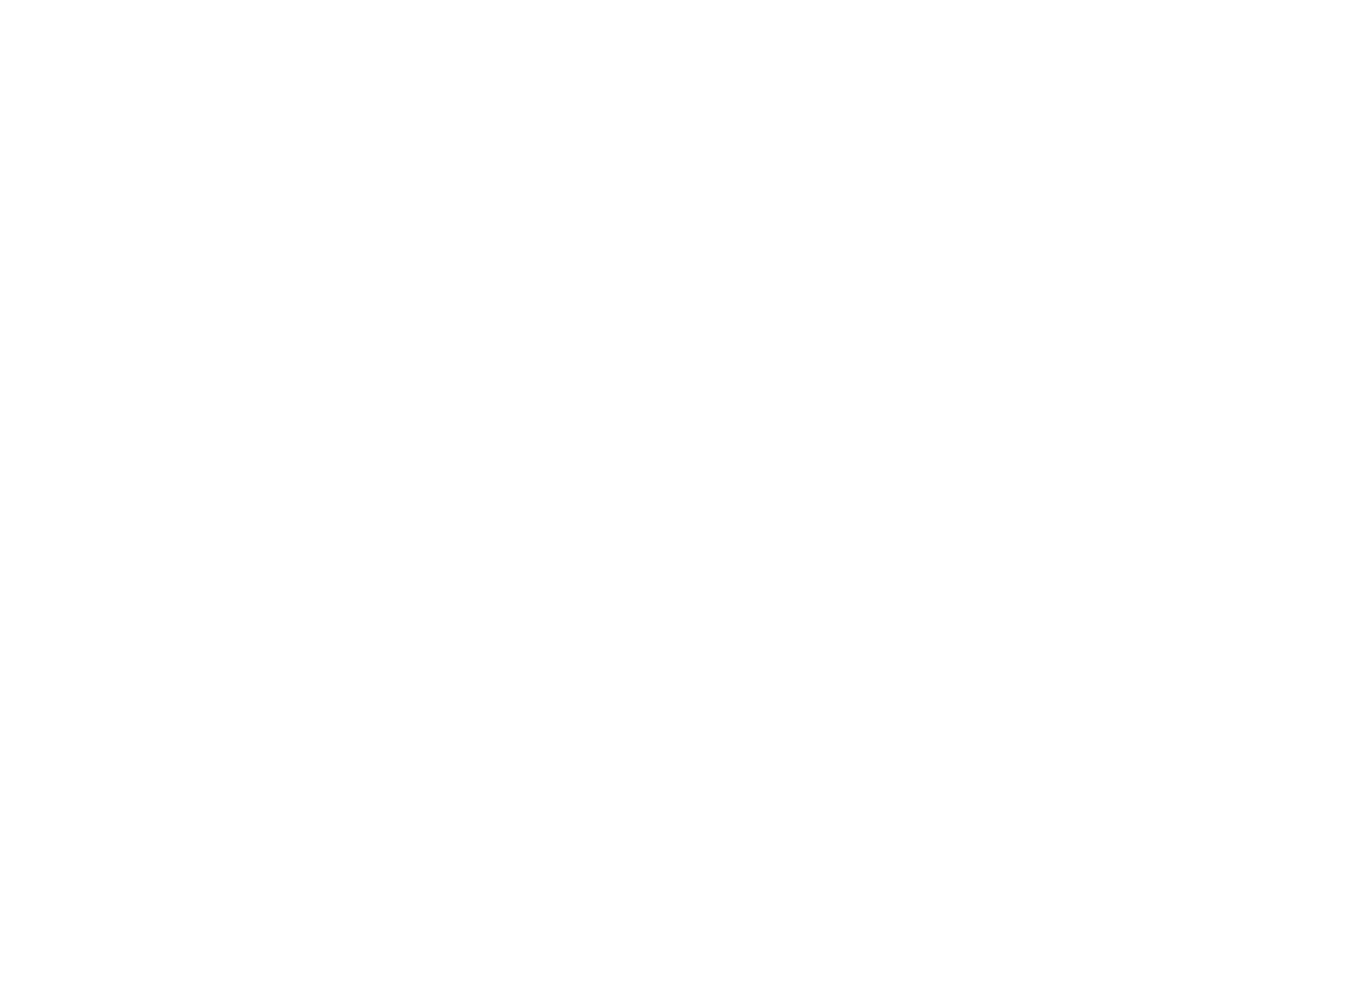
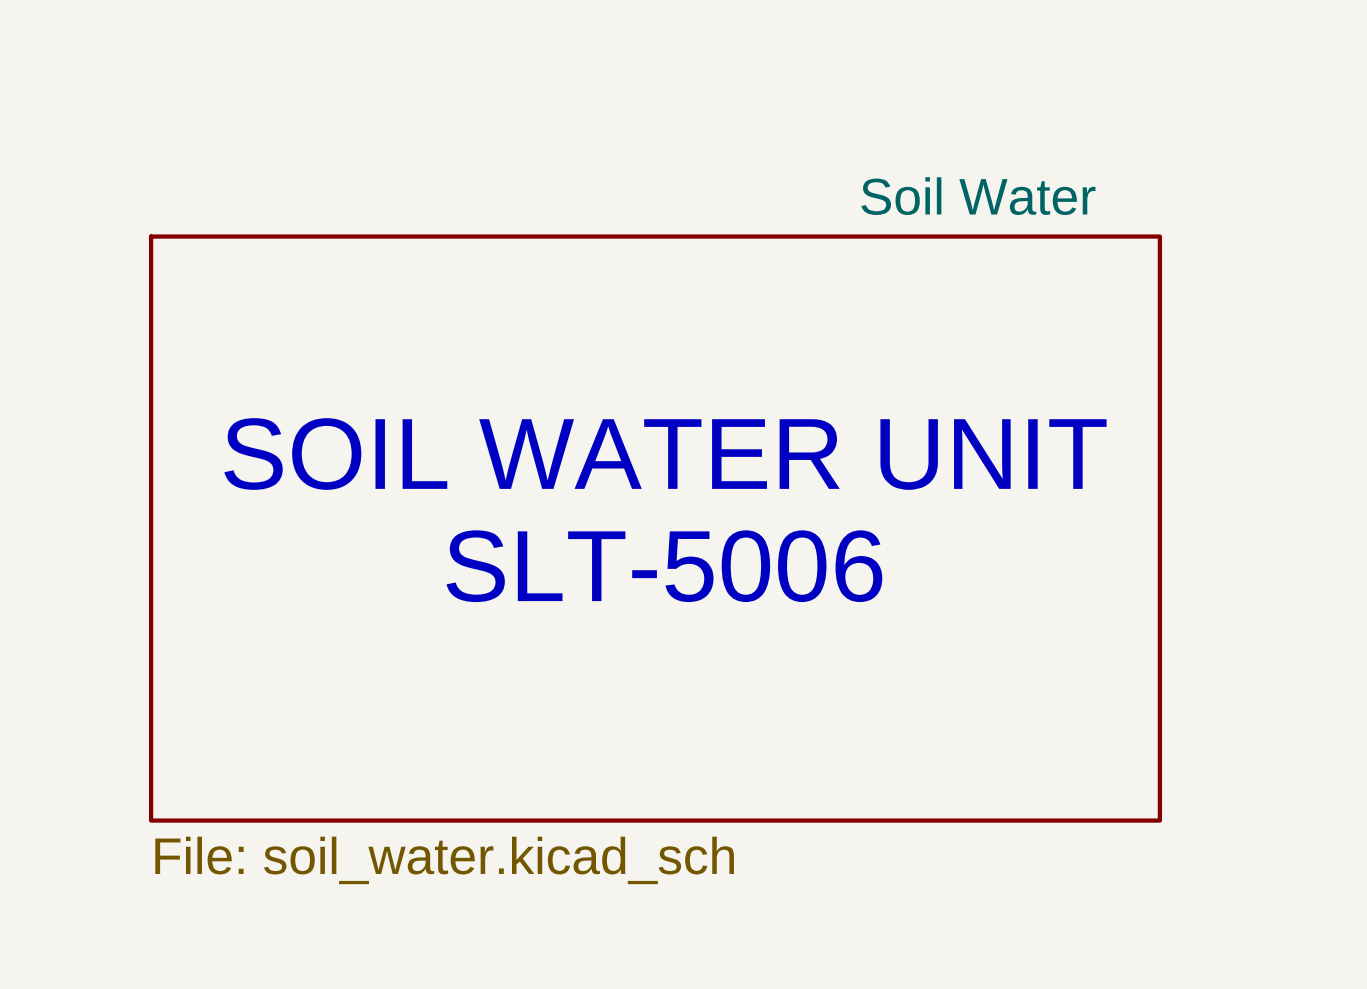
text: none -> SOIL WATER UNIT (665, 454)
sheet Soil Water: none -> File: soil_water.kicad_sch (655, 528)
text: none -> SLT-5006 (664, 566)

